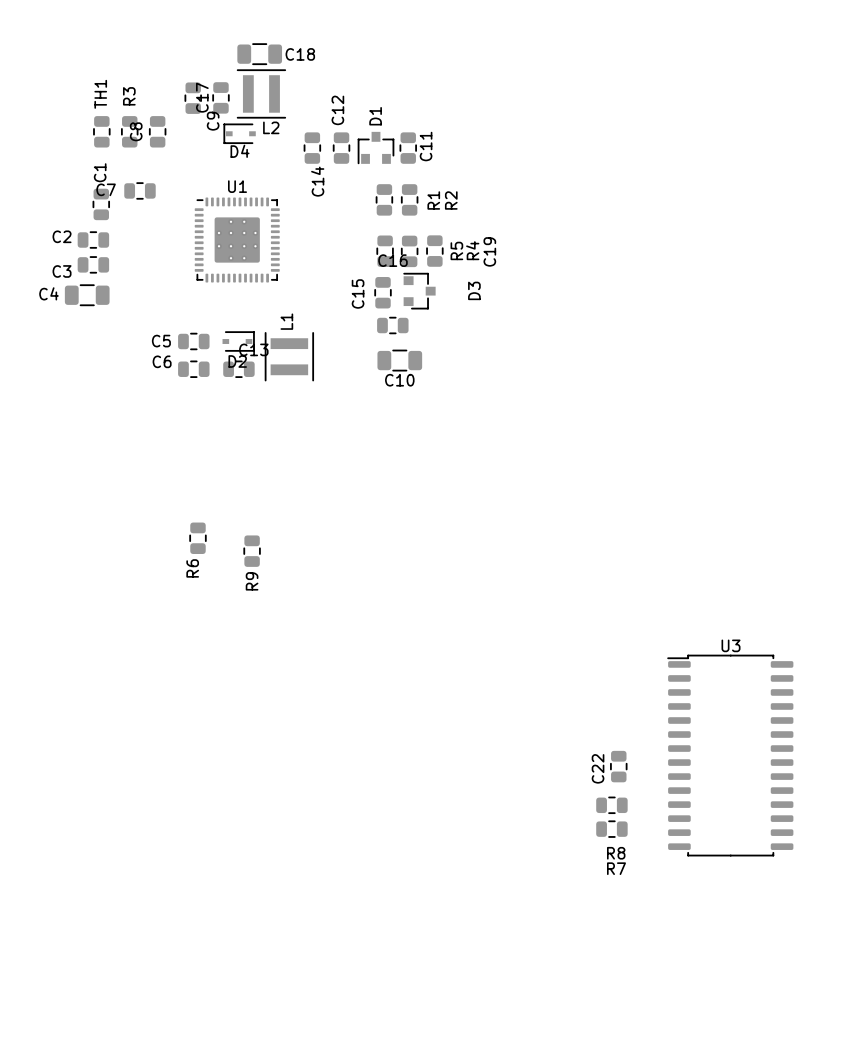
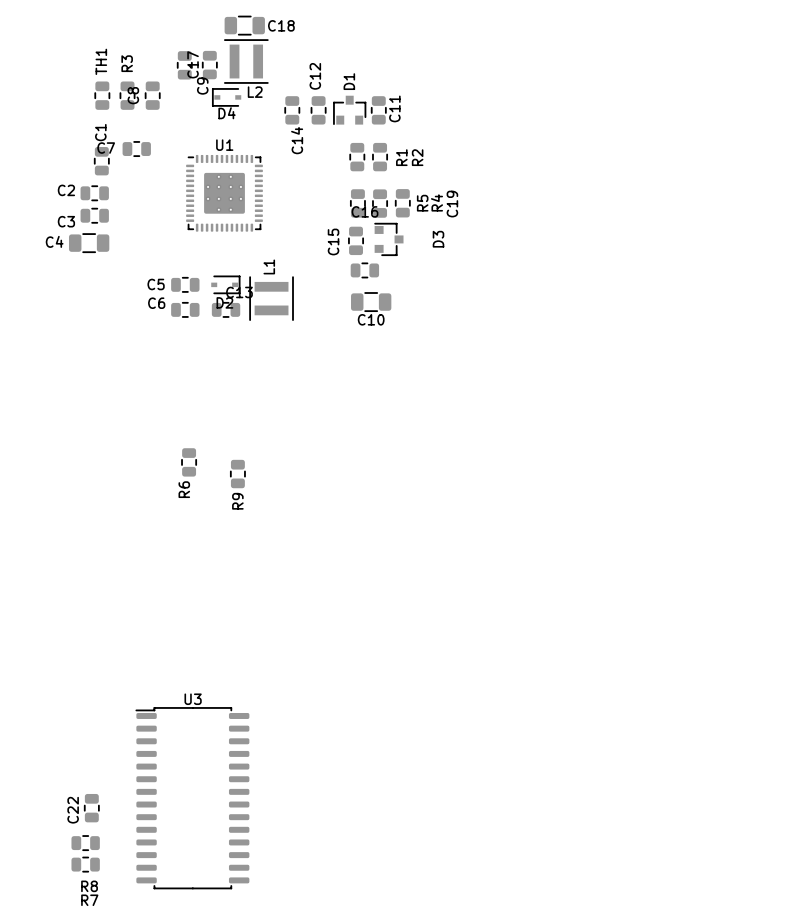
U3 position: (730, 755) -> (192, 798)
C22 position: (618, 766) -> (91, 808)
R8 position: (611, 805) -> (85, 843)
R7 position: (611, 829) -> (85, 864)

